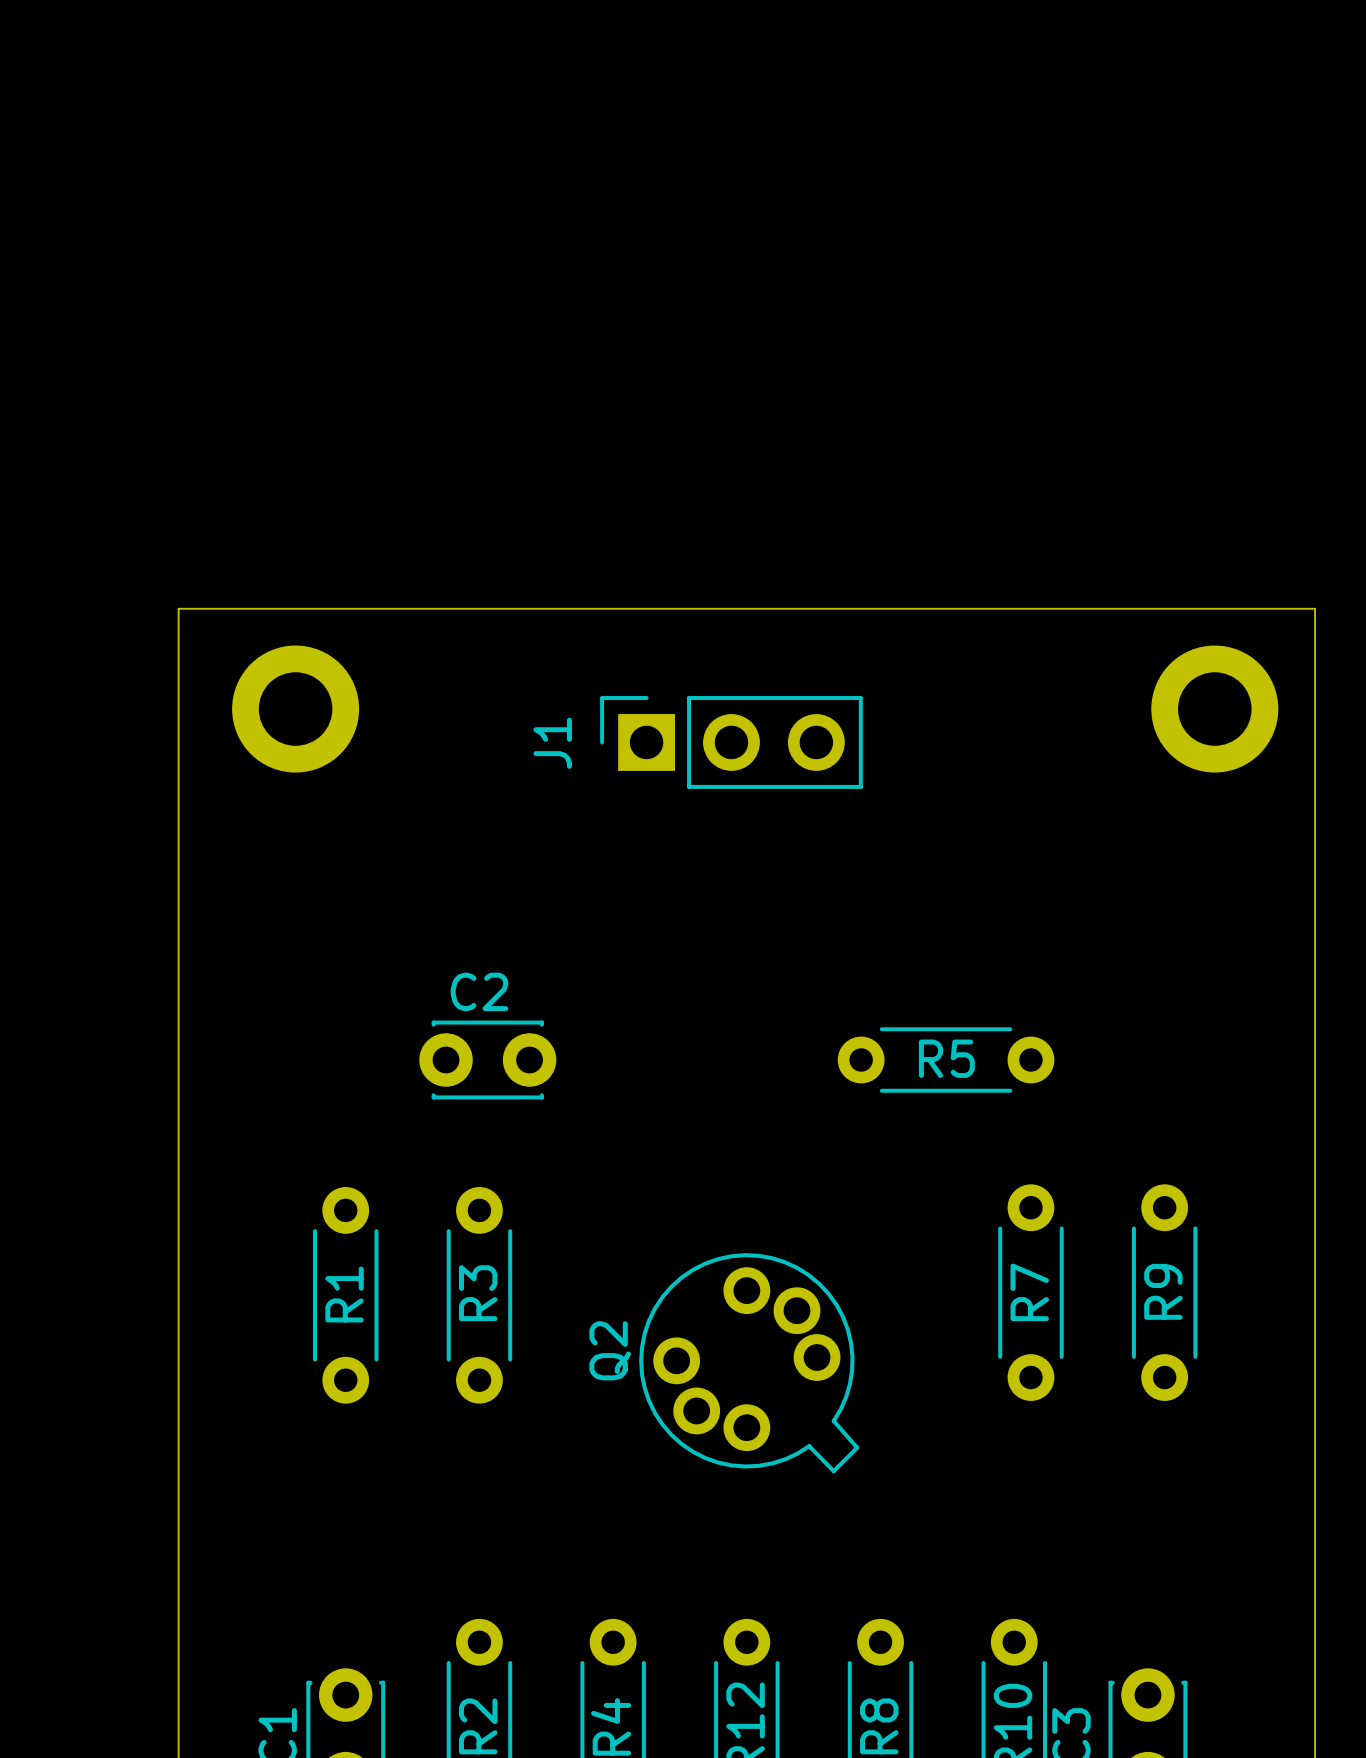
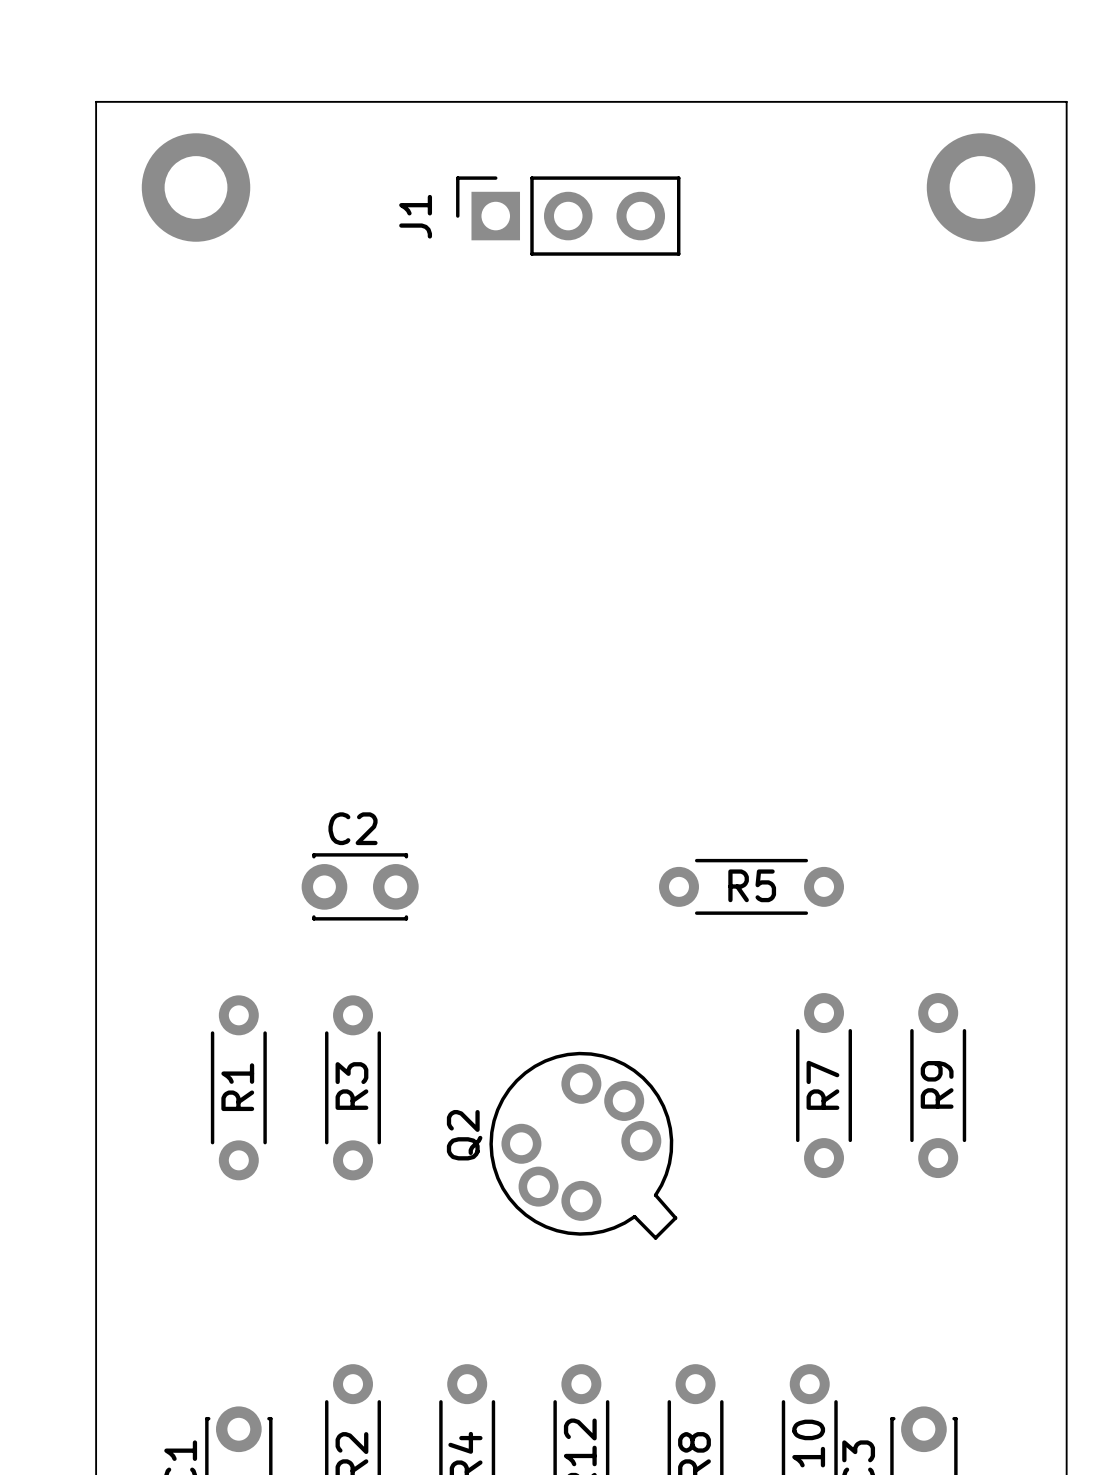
board edge: (178, 608) (1315, 608) -> (96, 501) (96, 101) (1066, 101) (1066, 501)
part position: (295, 709) -> (196, 187)
part position: (1214, 709) -> (981, 187)
J1 position: (731, 742) -> (568, 216)

